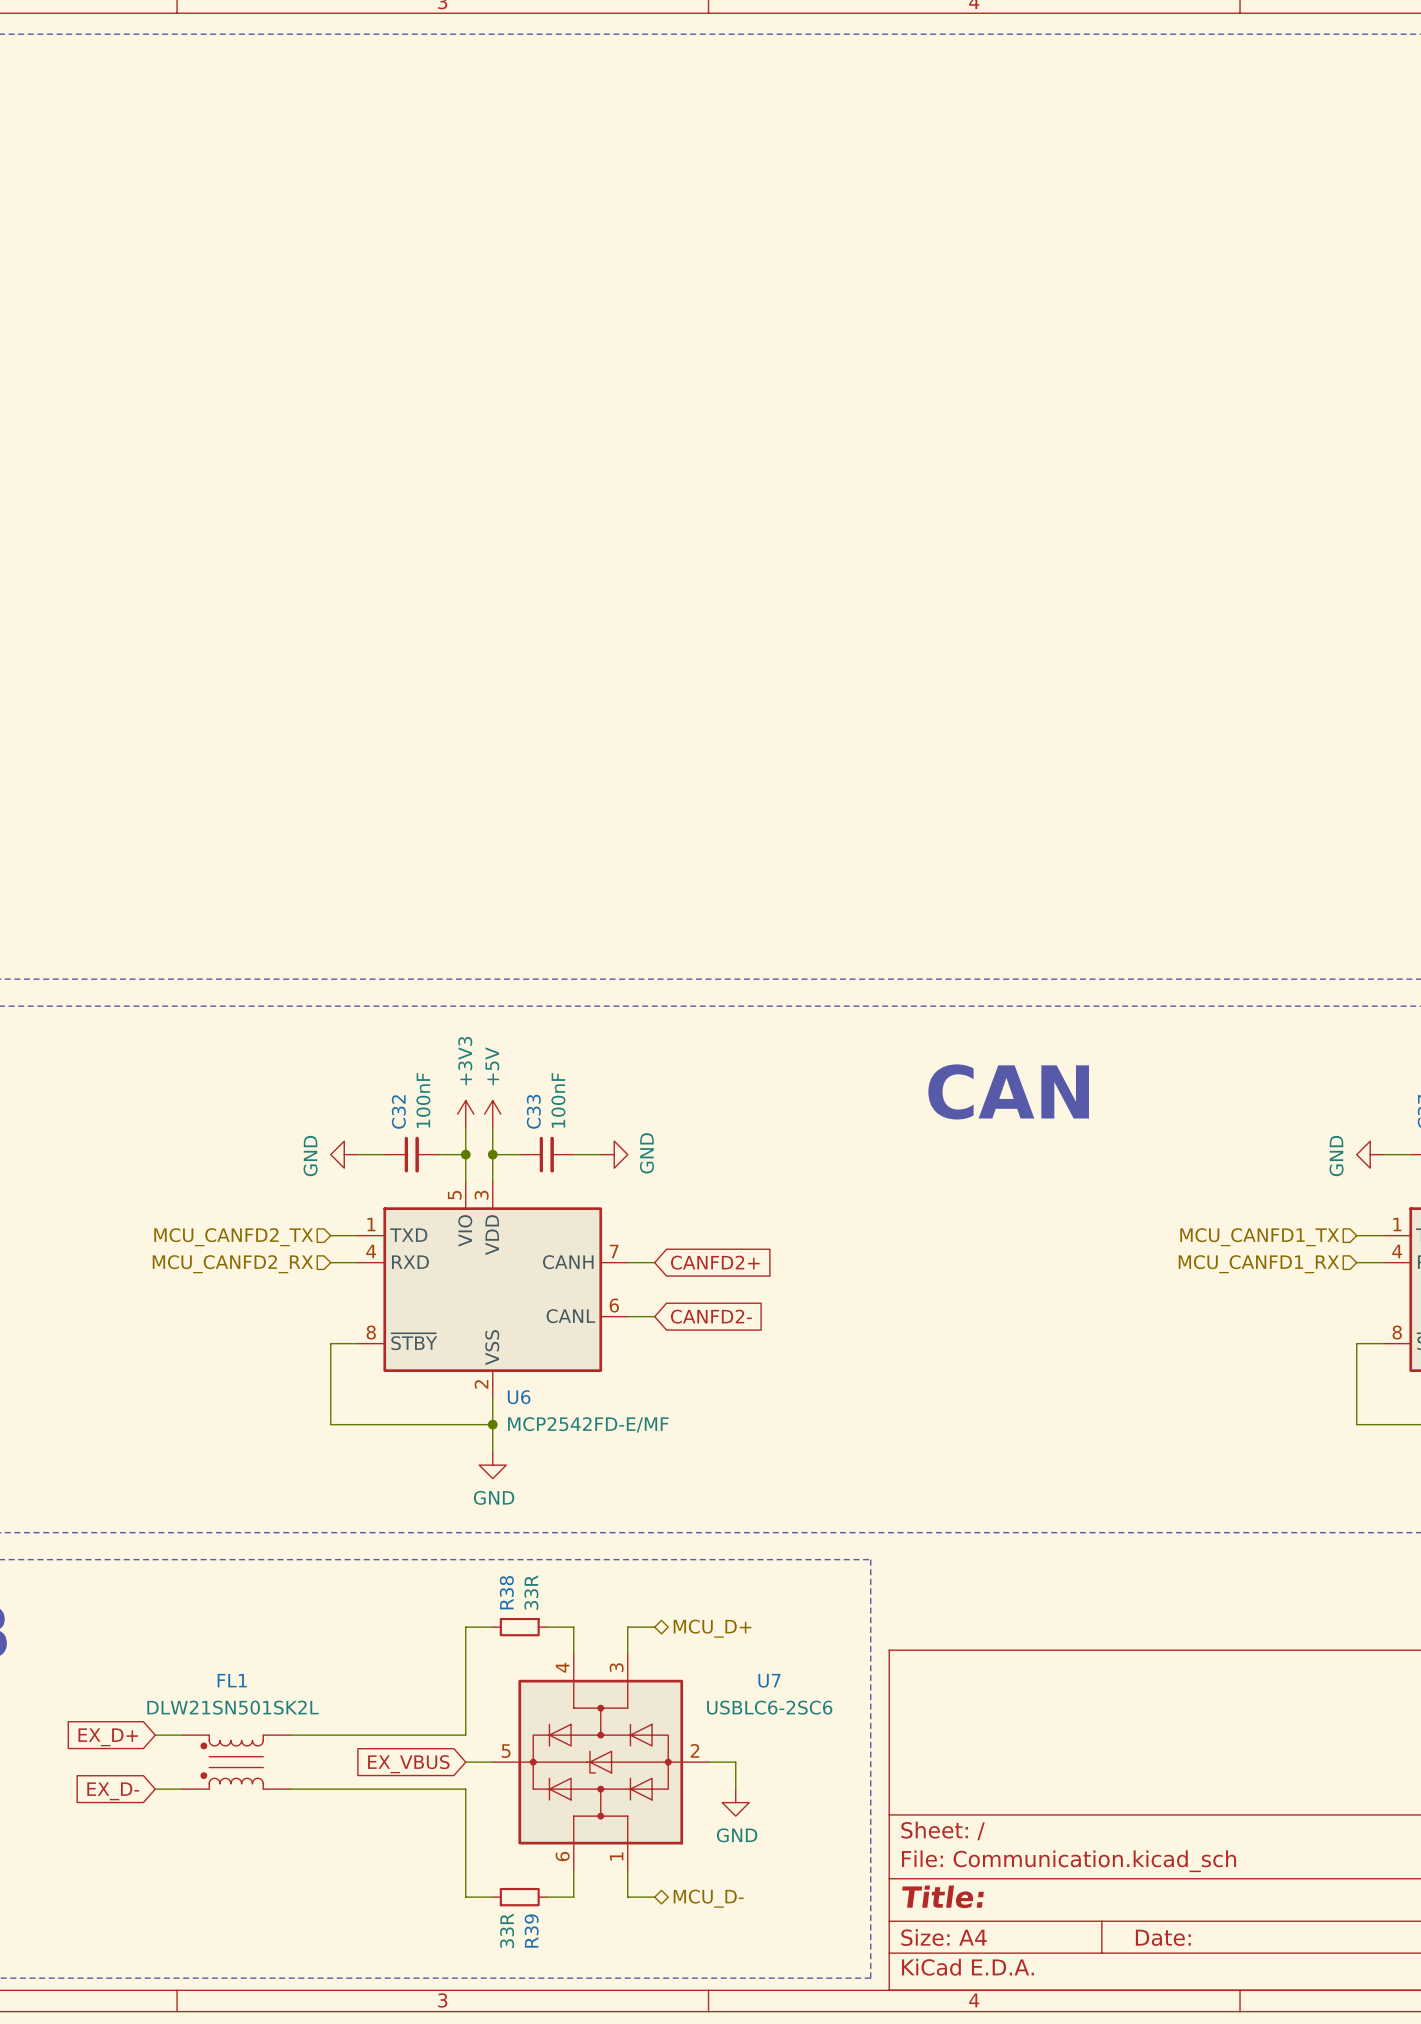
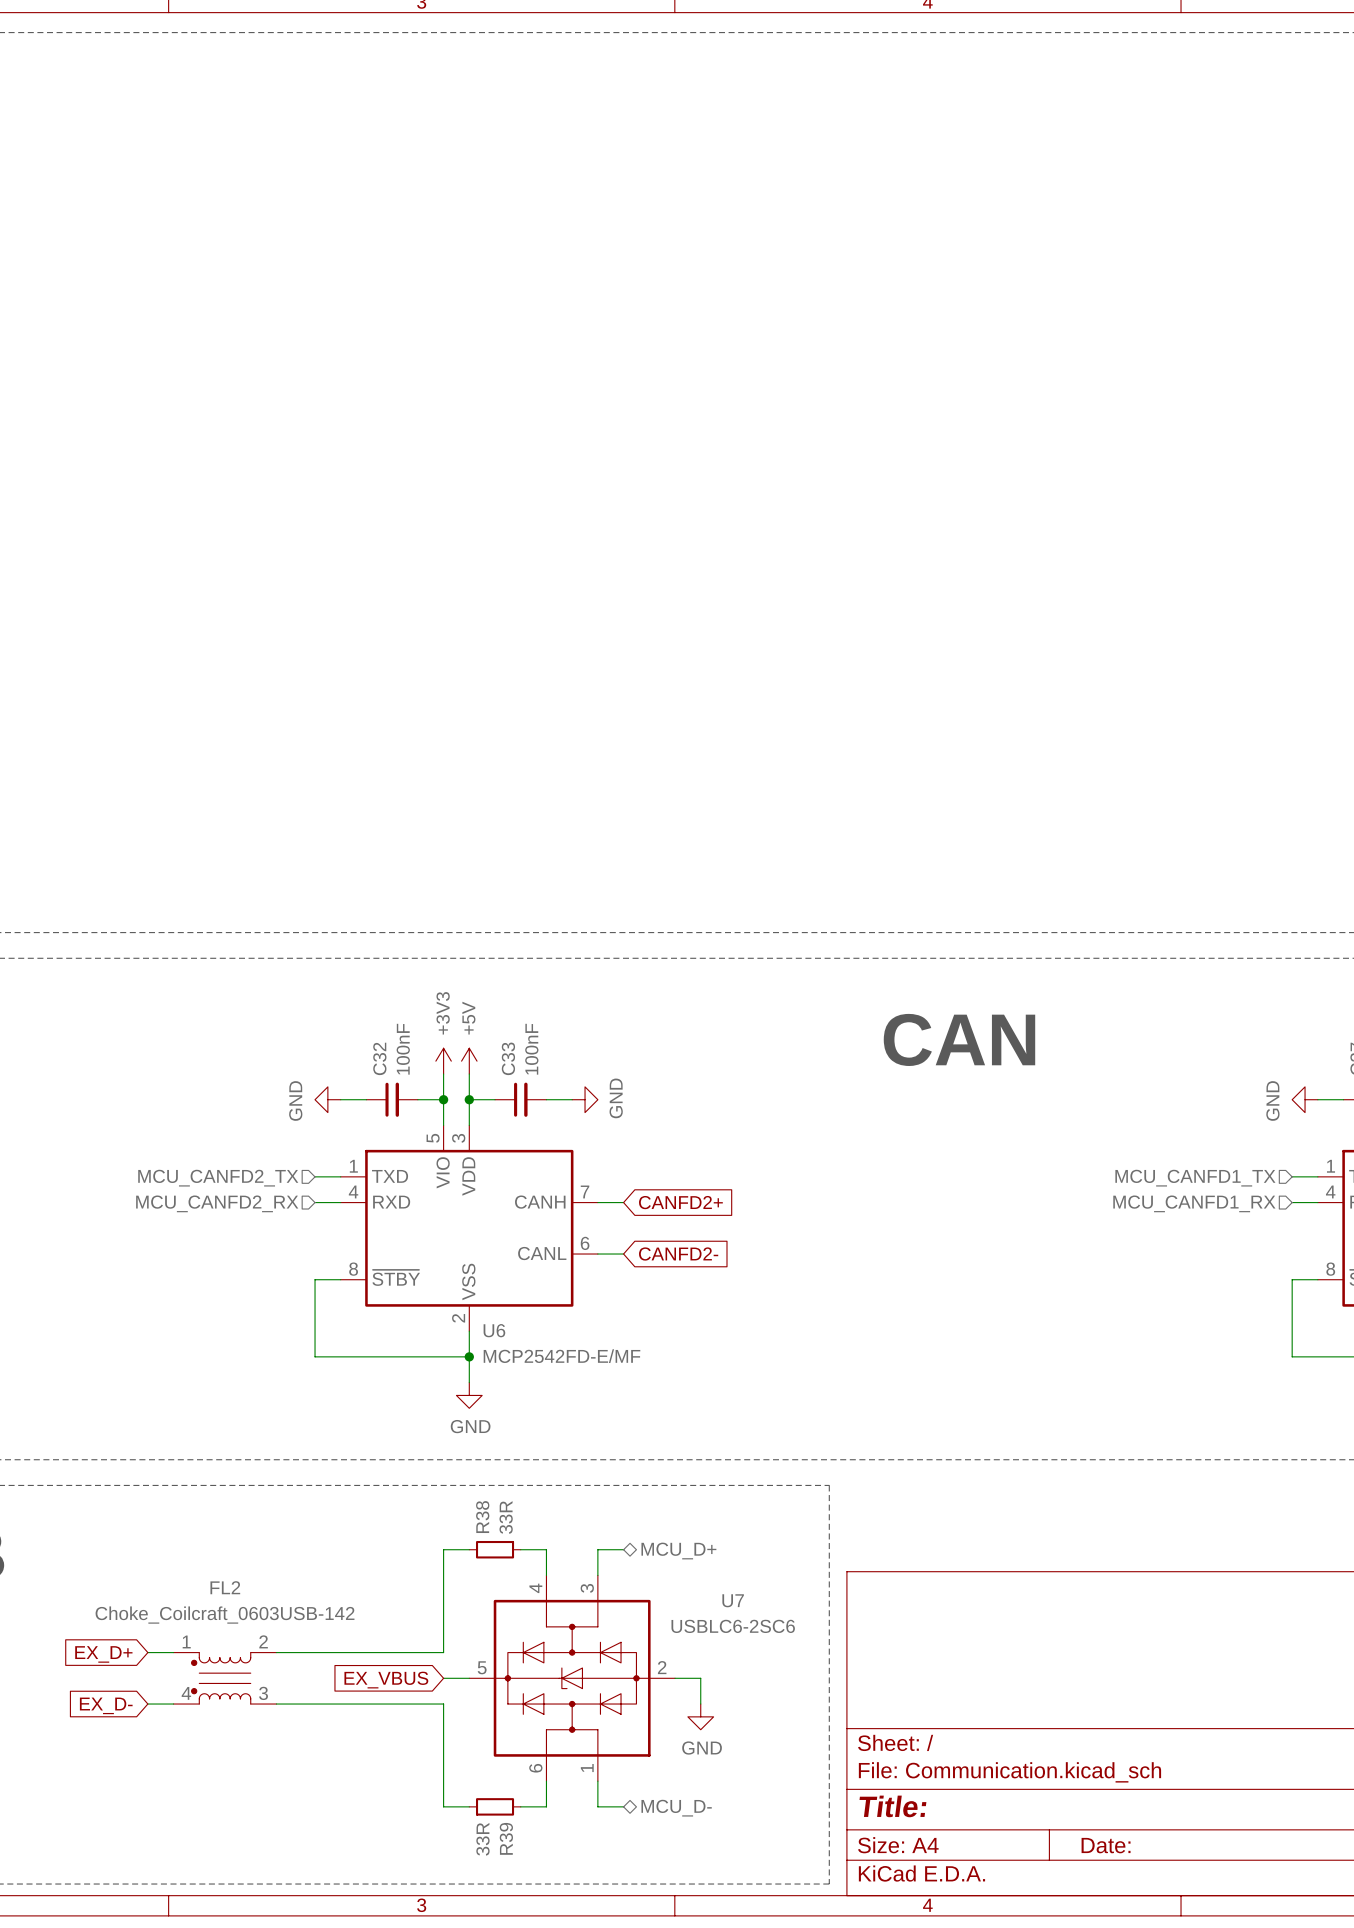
FL1 name: FL1 (232, 1680) -> FL2 (225, 1587)
FL1 value: DLW21SN501SK2L (233, 1707) -> Choke_Coilcraft_0603USB-142 (225, 1615)
FL1 pin number: none -> 1 (186, 1641)
FL1 pin number: none -> 2 (263, 1641)
FL1 pin number: none -> 4 (186, 1693)
FL1 pin number: none -> 3 (263, 1693)

